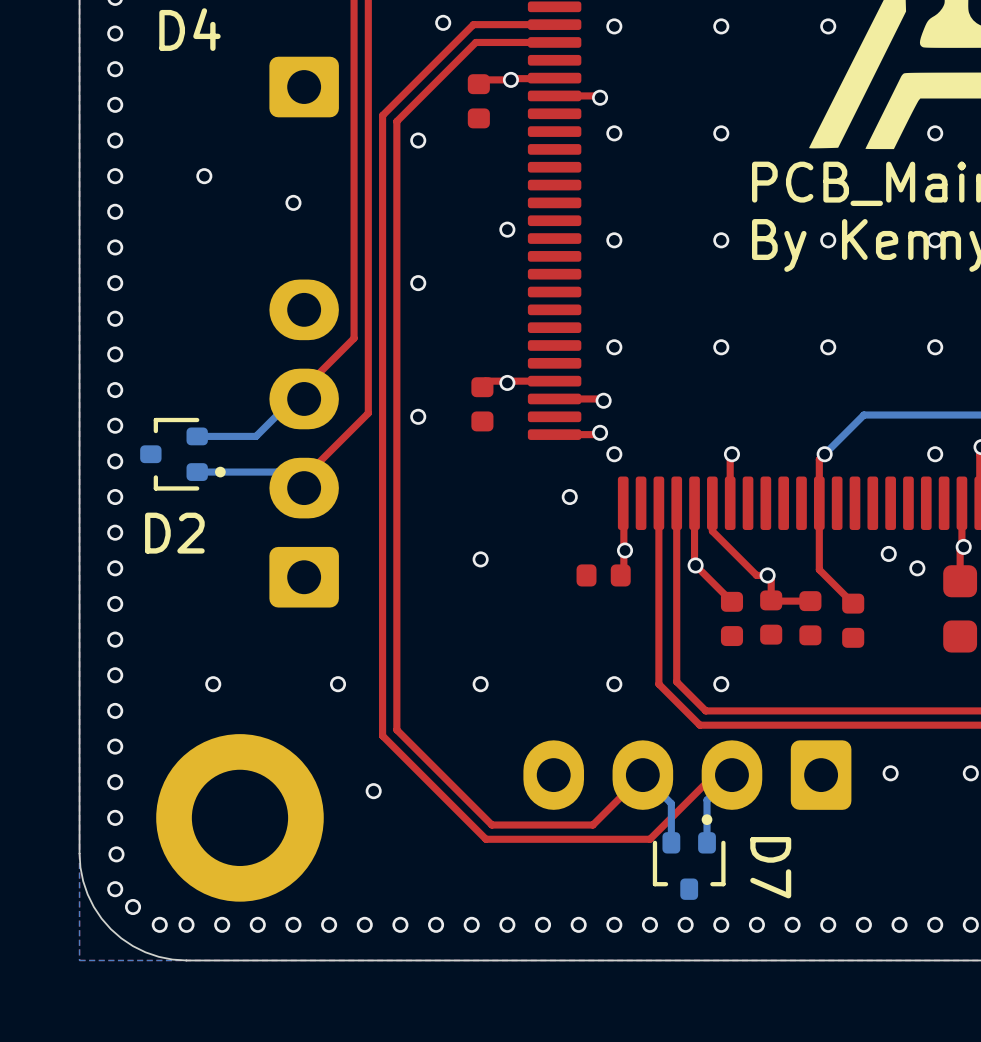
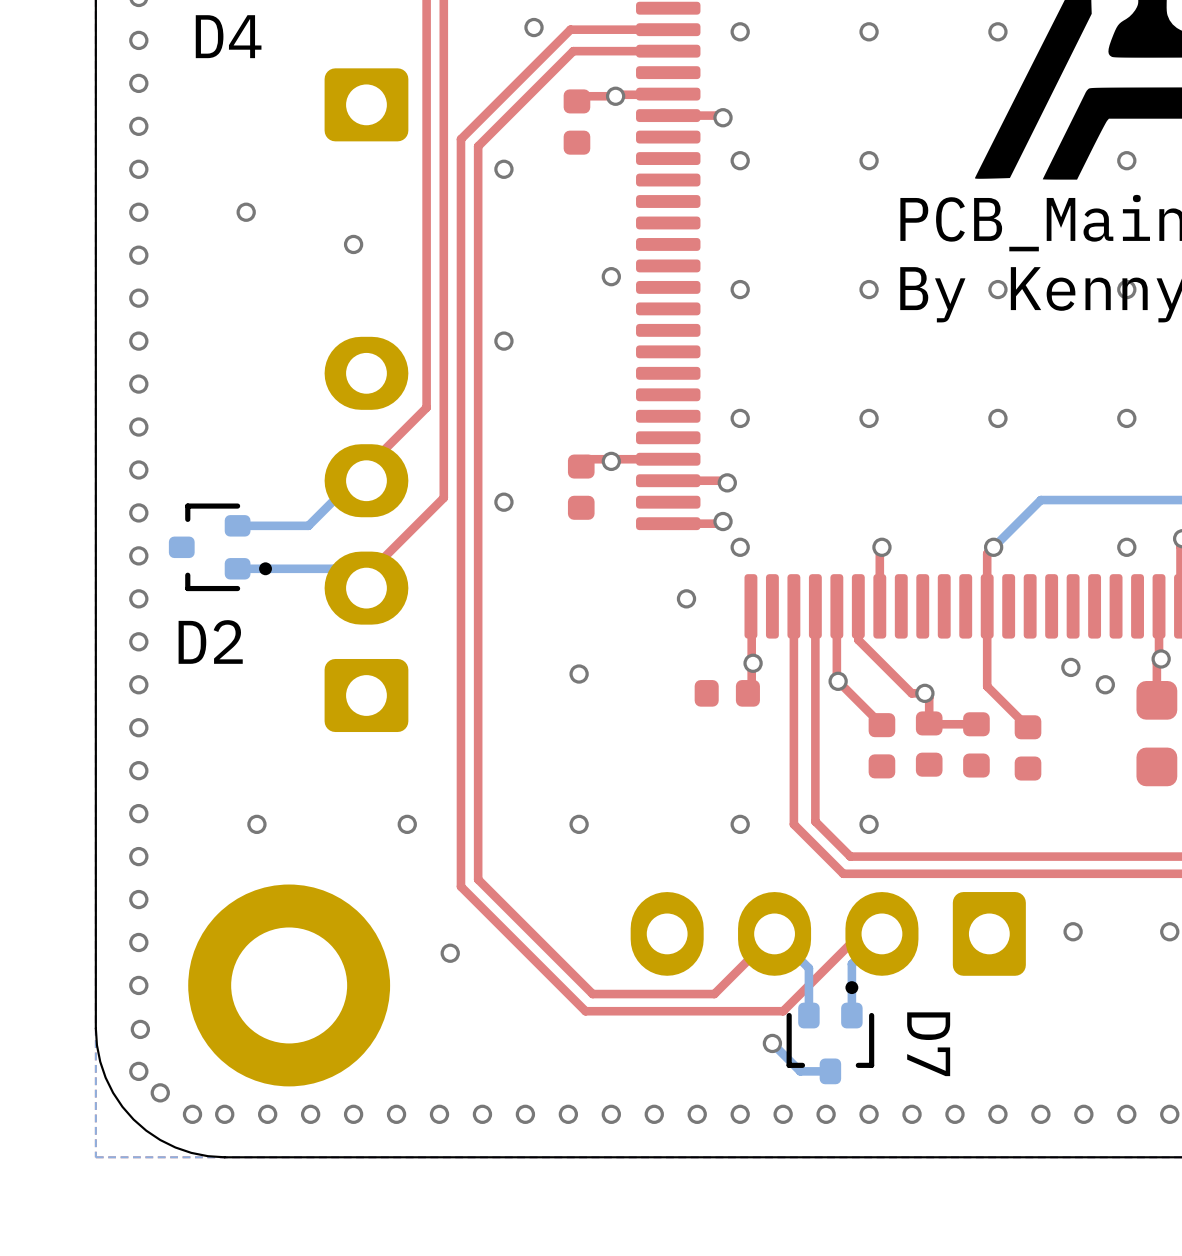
bottom track: none -> (772, 1043) (800, 1071) (830, 1071)
via: none -> (772, 1043)

